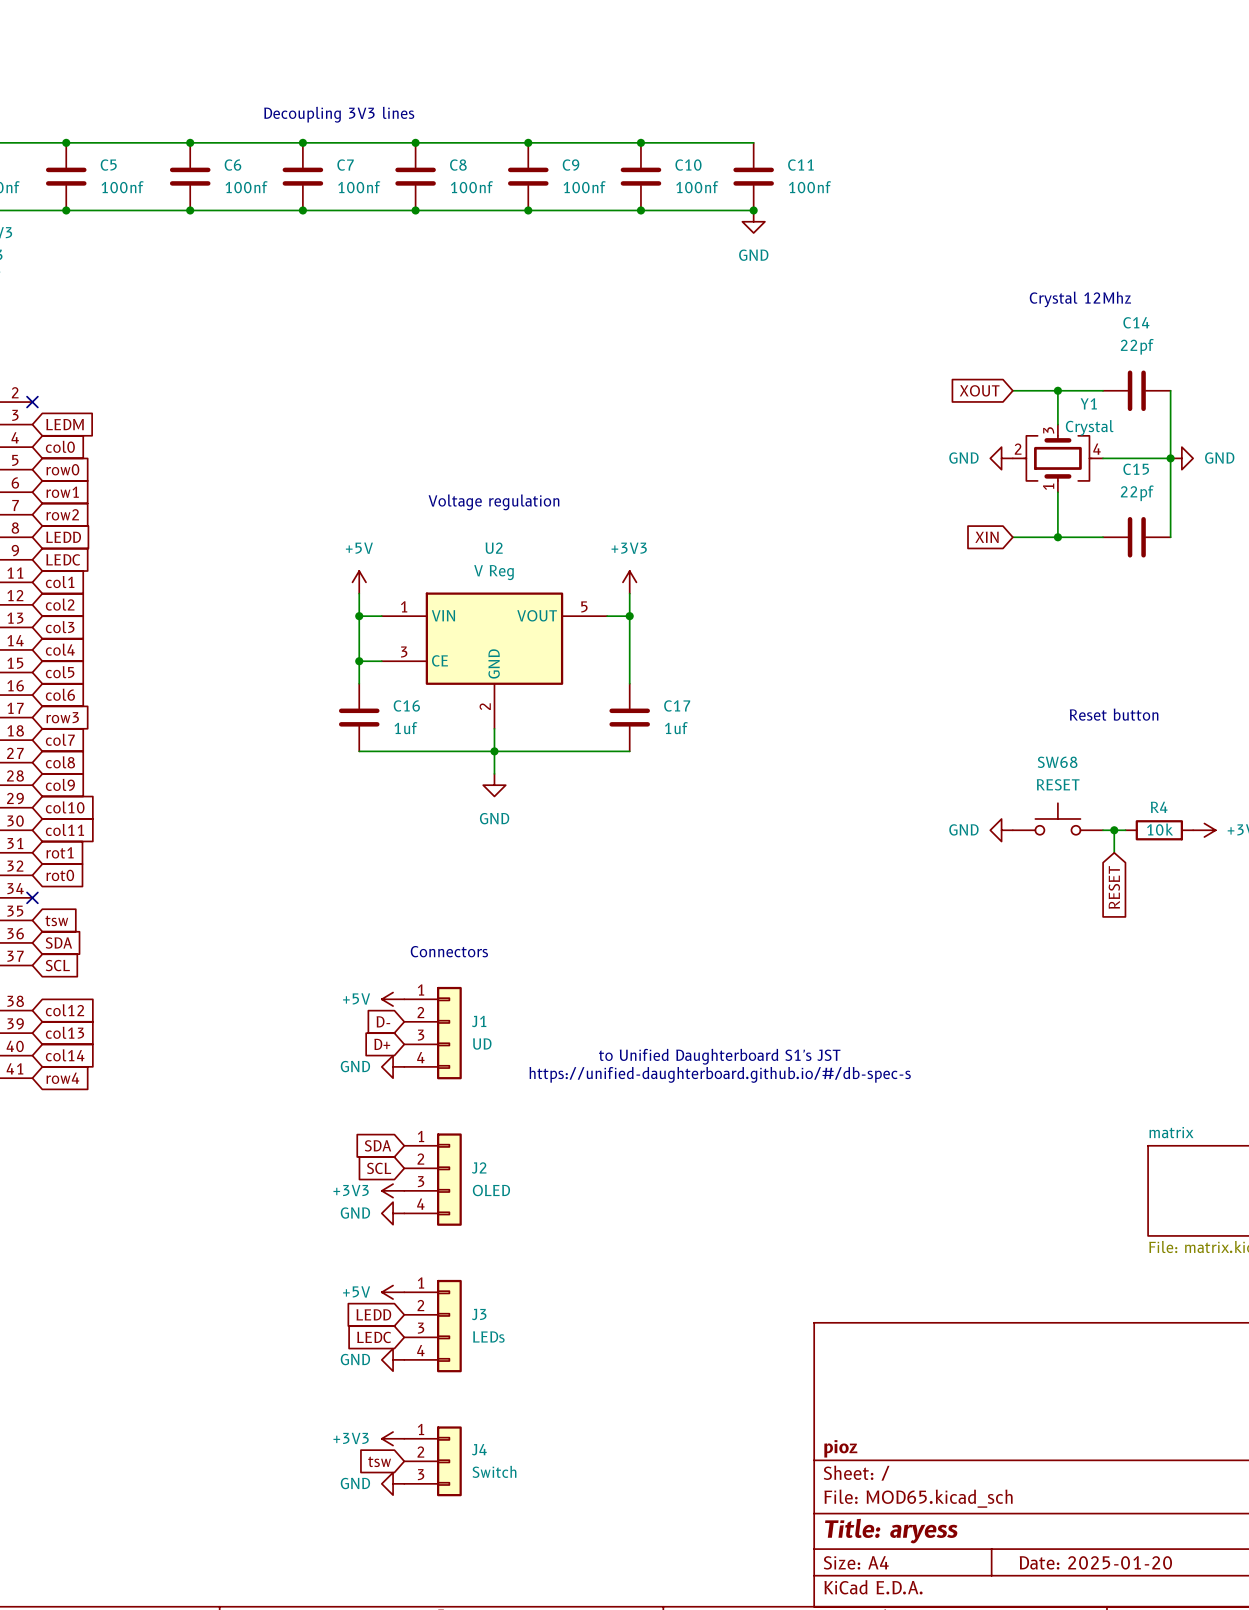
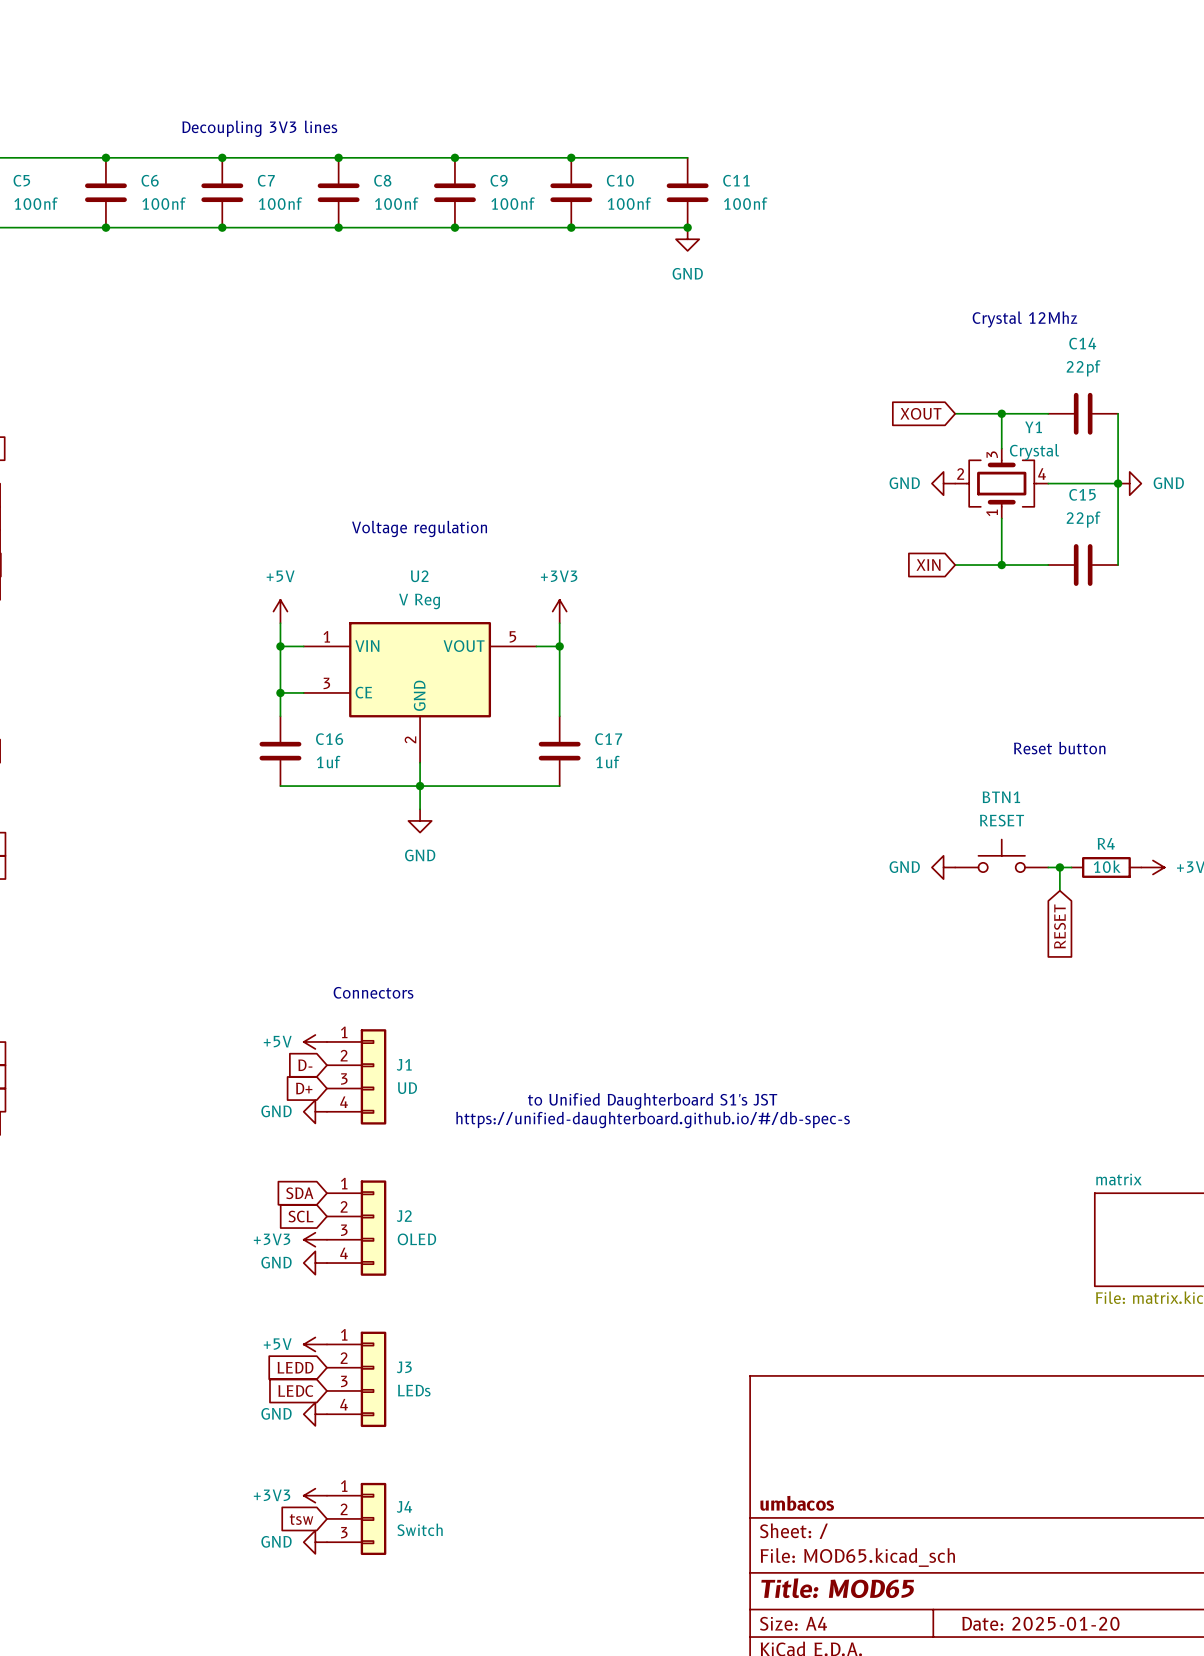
SW68 name: SW68 (1057, 762) -> BTN1 (1001, 797)
title block: pioz (840, 1448) -> umbacos (797, 1503)
title block: Title: aryess (891, 1531) -> Title: MOD65 (837, 1588)

